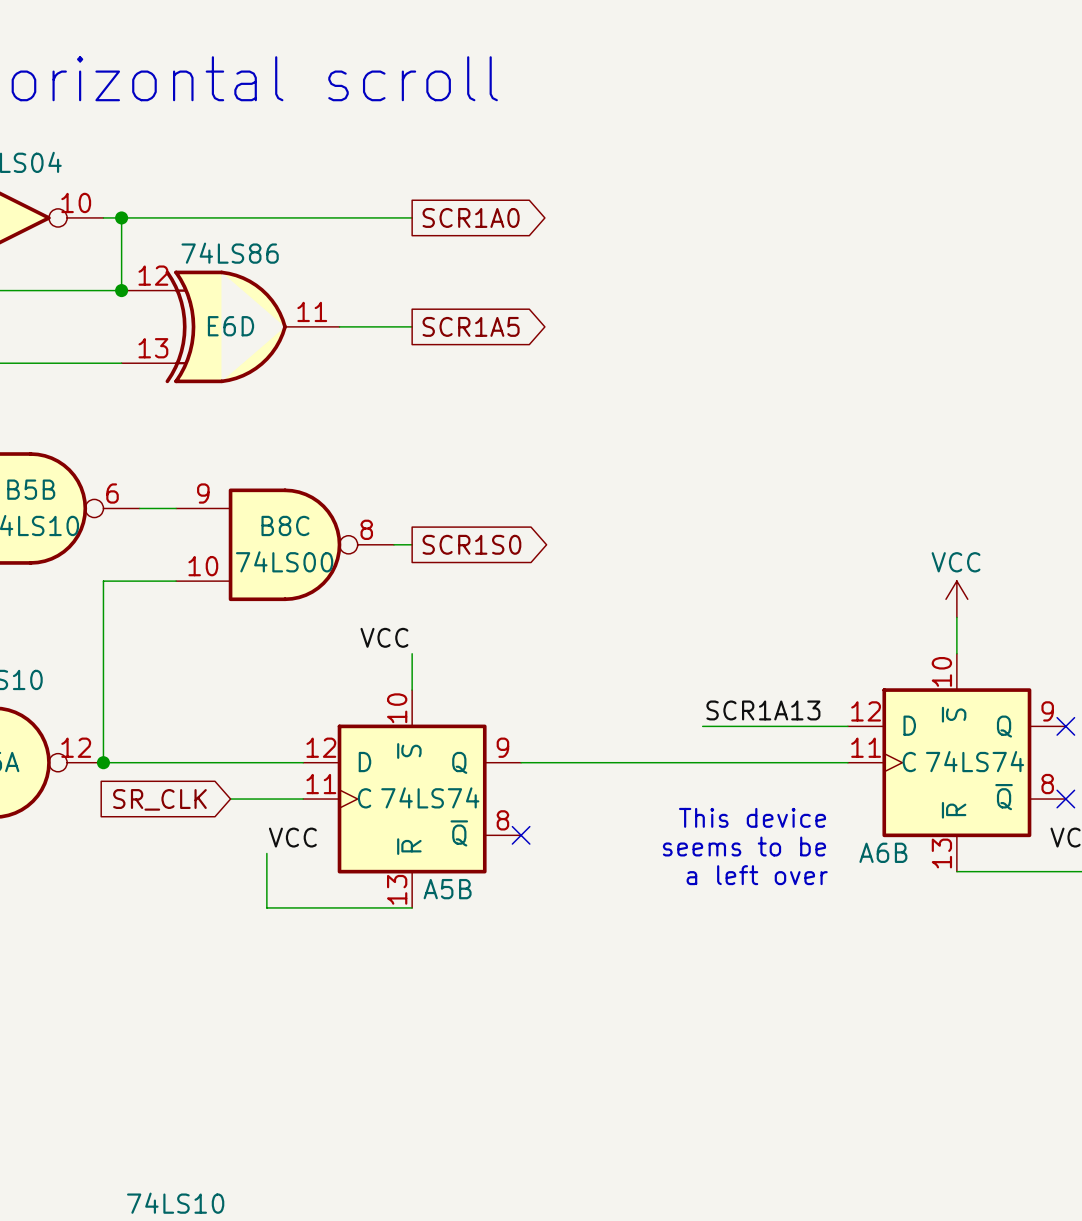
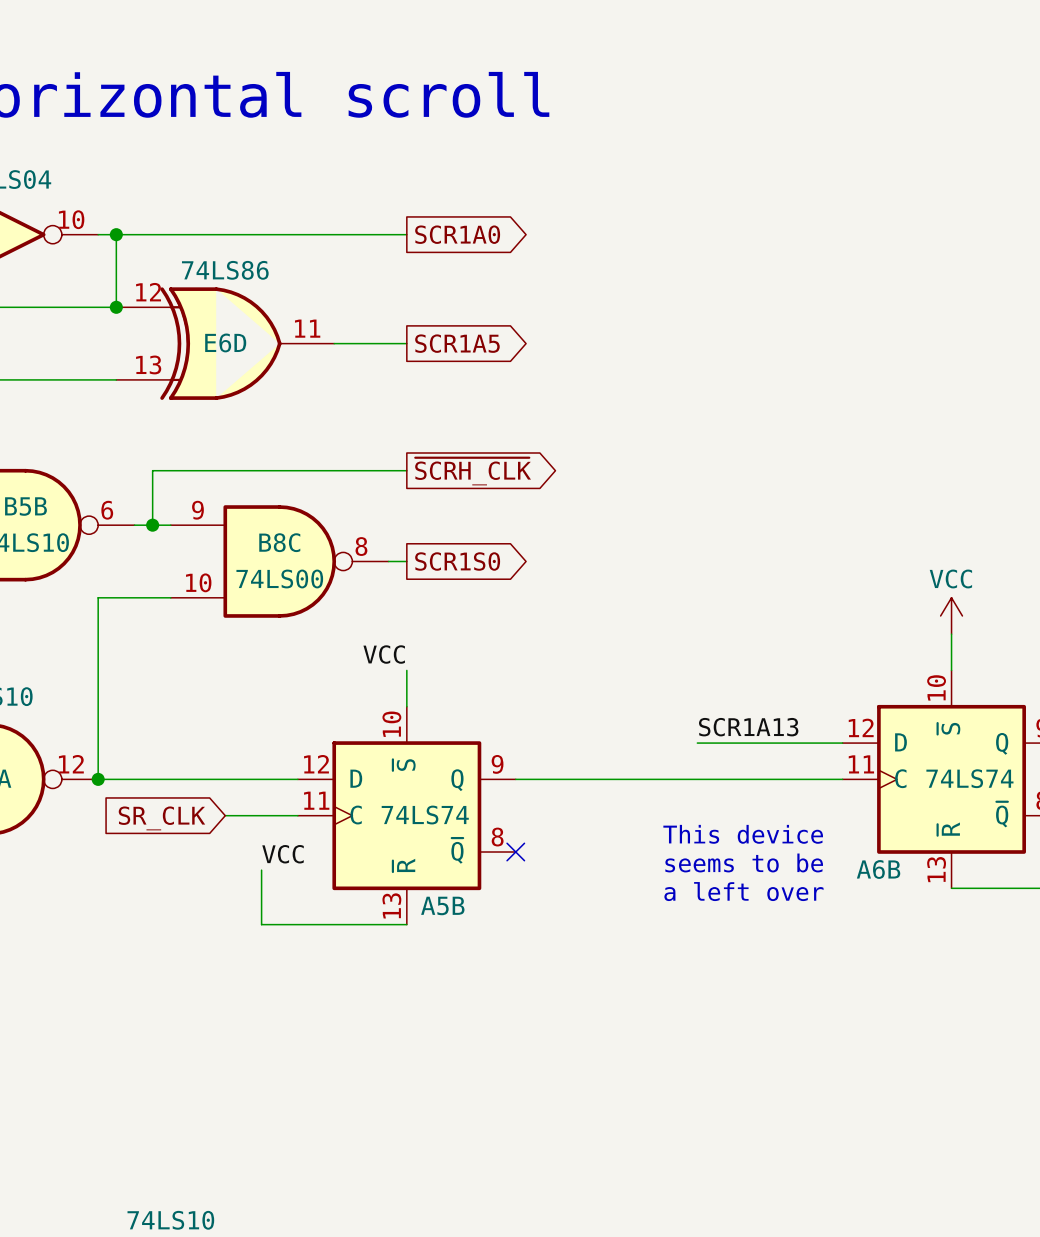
global label: none -> ~{SCRH_CLK} (473, 471)
wire: none -> (406, 470) (152, 470) (152, 525)
junction: none -> (152, 525)

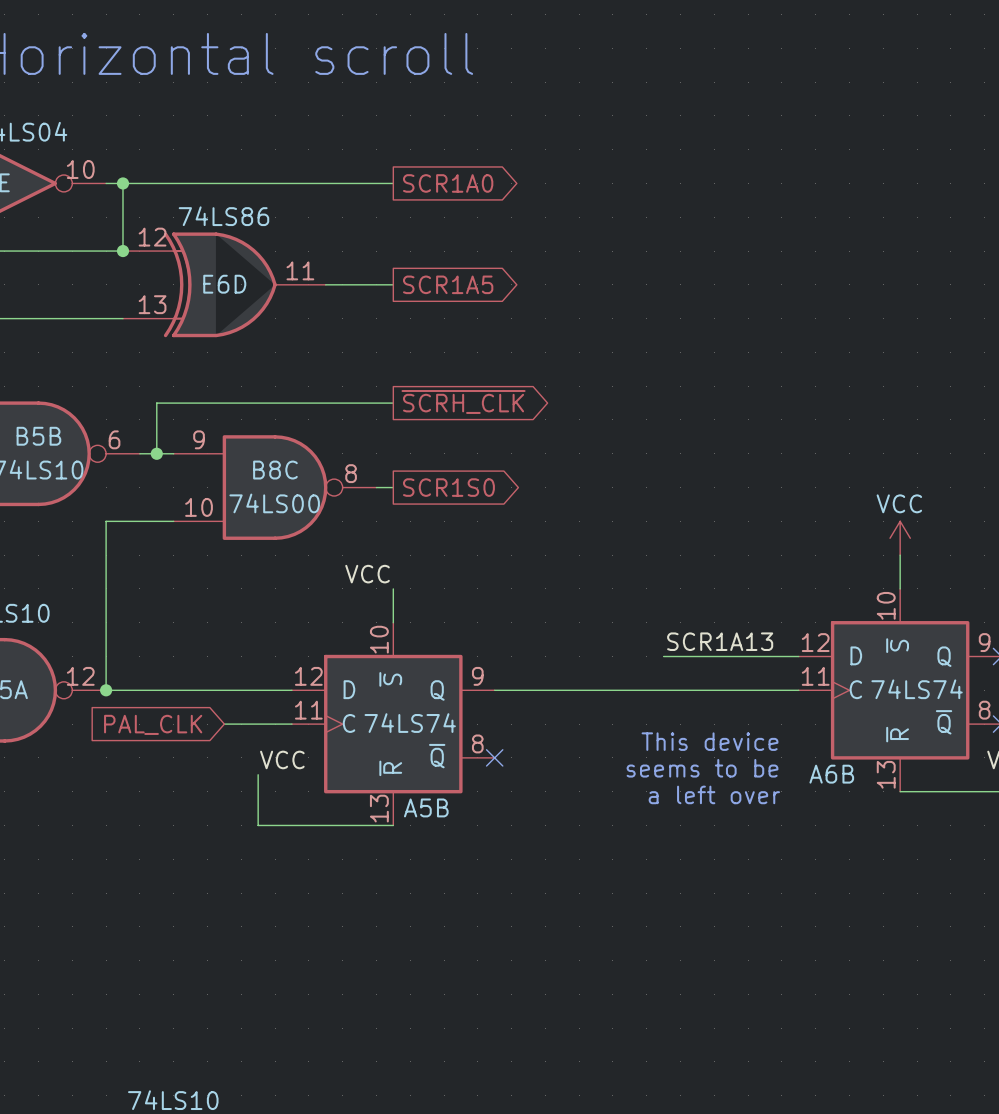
global label: SR_CLK (161, 818) -> PAL_CLK (153, 724)

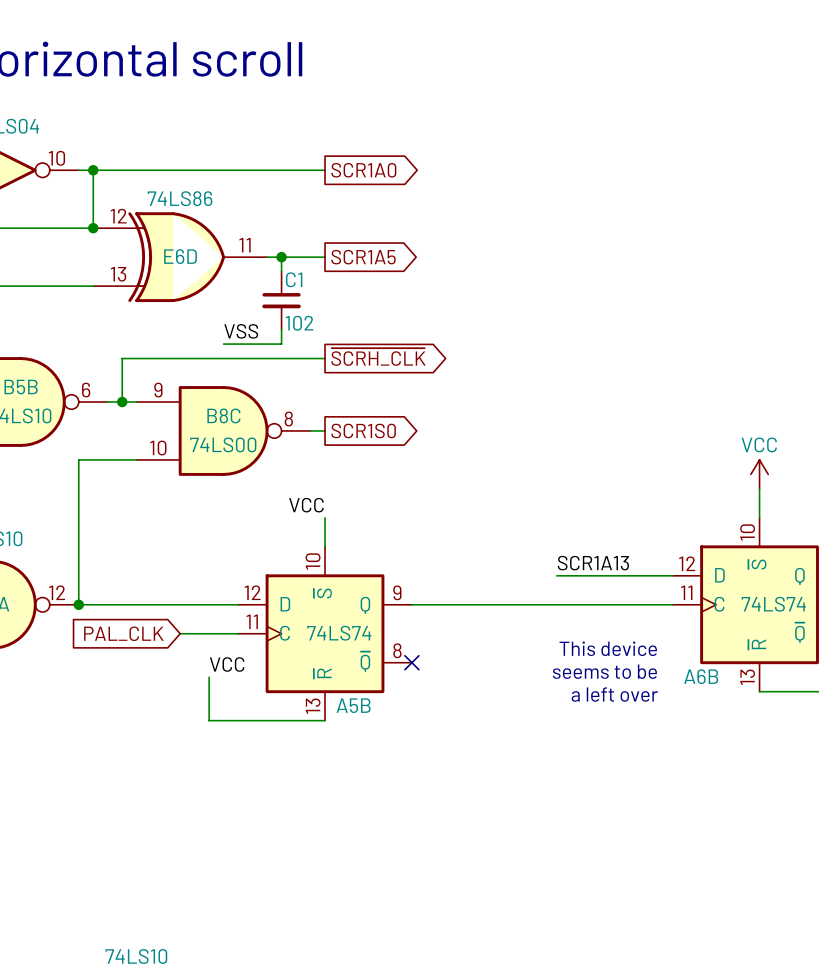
wire: none -> (281, 257) (281, 271)
junction: none -> (281, 257)
C1: none -> 102 (281, 300)
wire: none -> (281, 329) (281, 344) (223, 344)
label: none -> VSS (241, 331)

